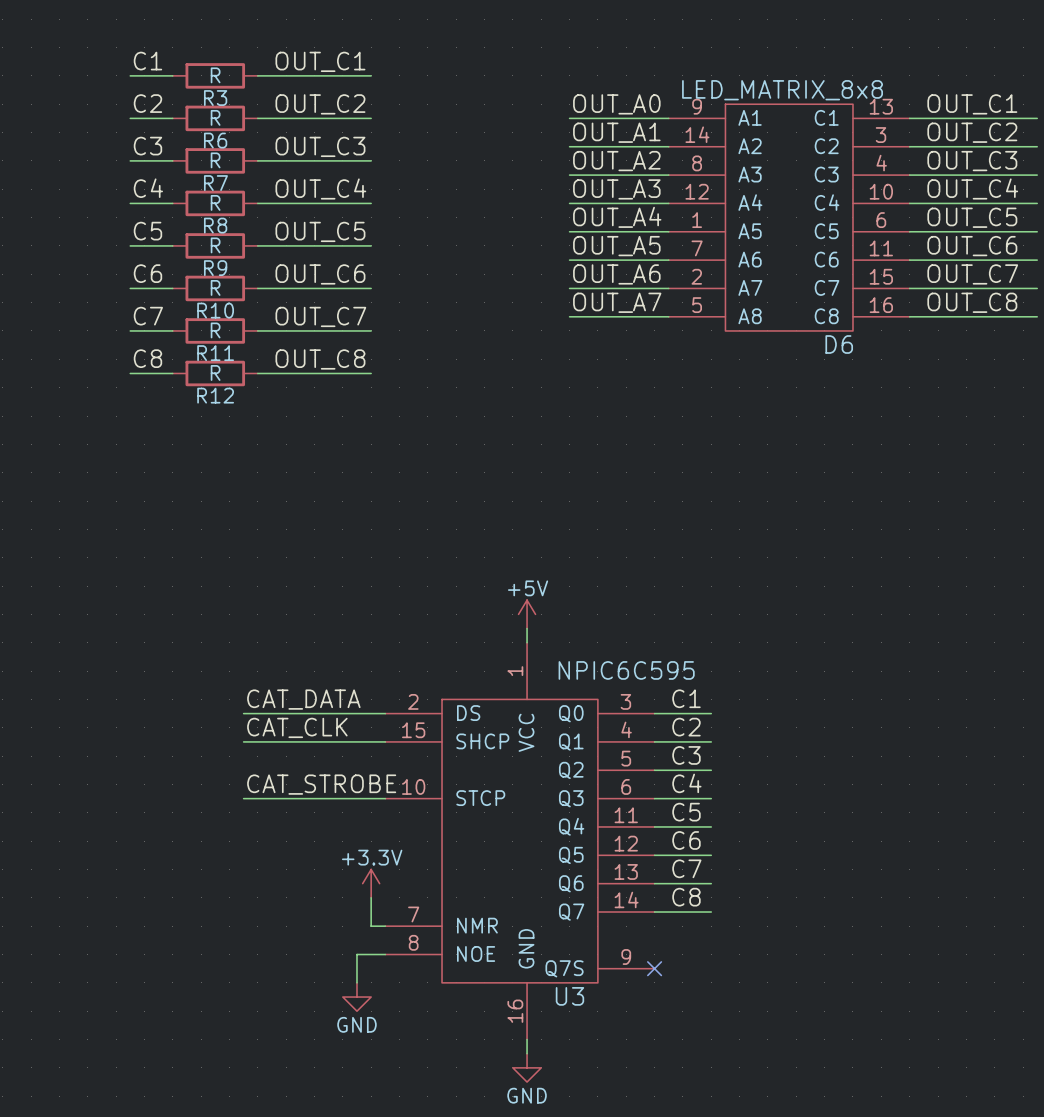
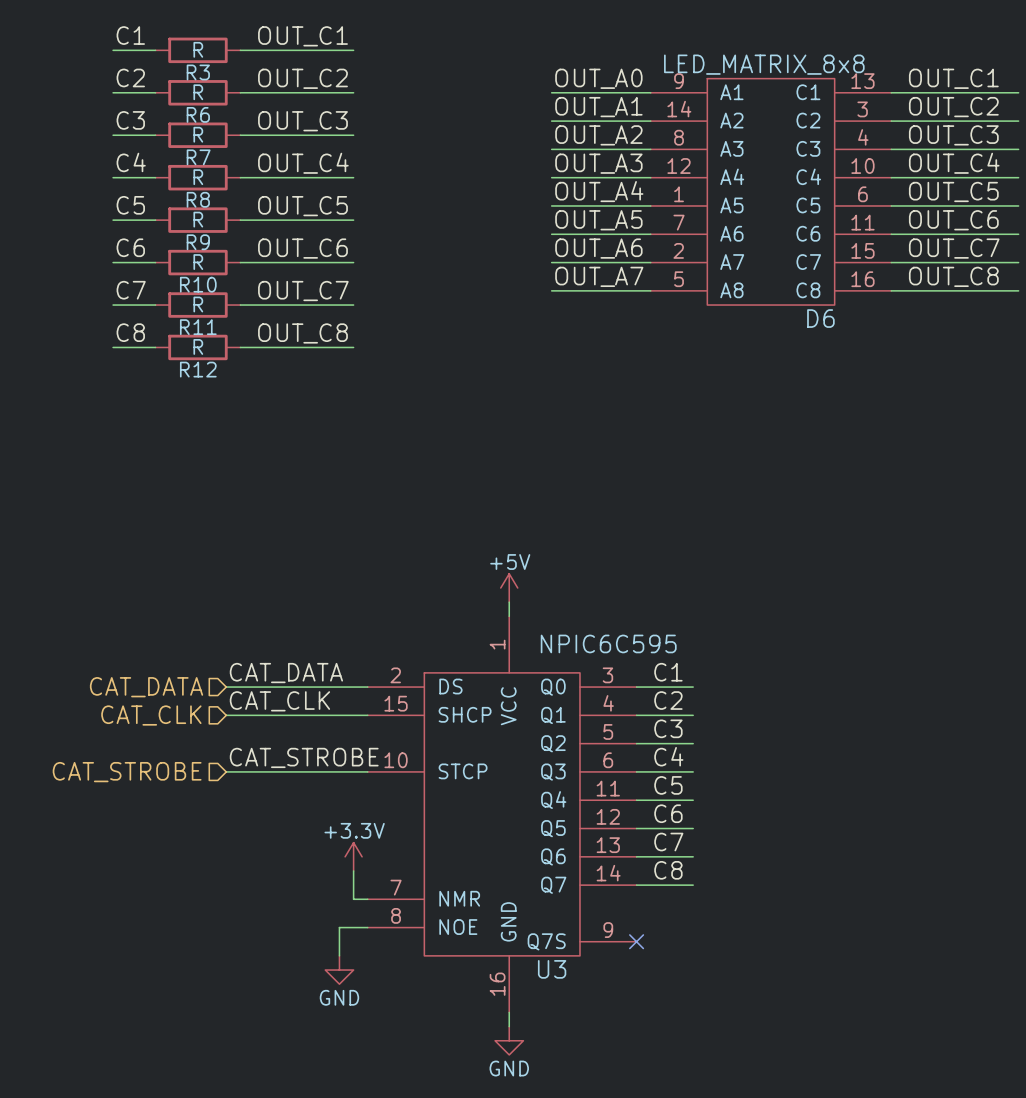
hierarchical label: none -> CAT_DATA (146, 687)
hierarchical label: none -> CAT_CLK (151, 715)
hierarchical label: none -> CAT_STROBE (127, 772)

